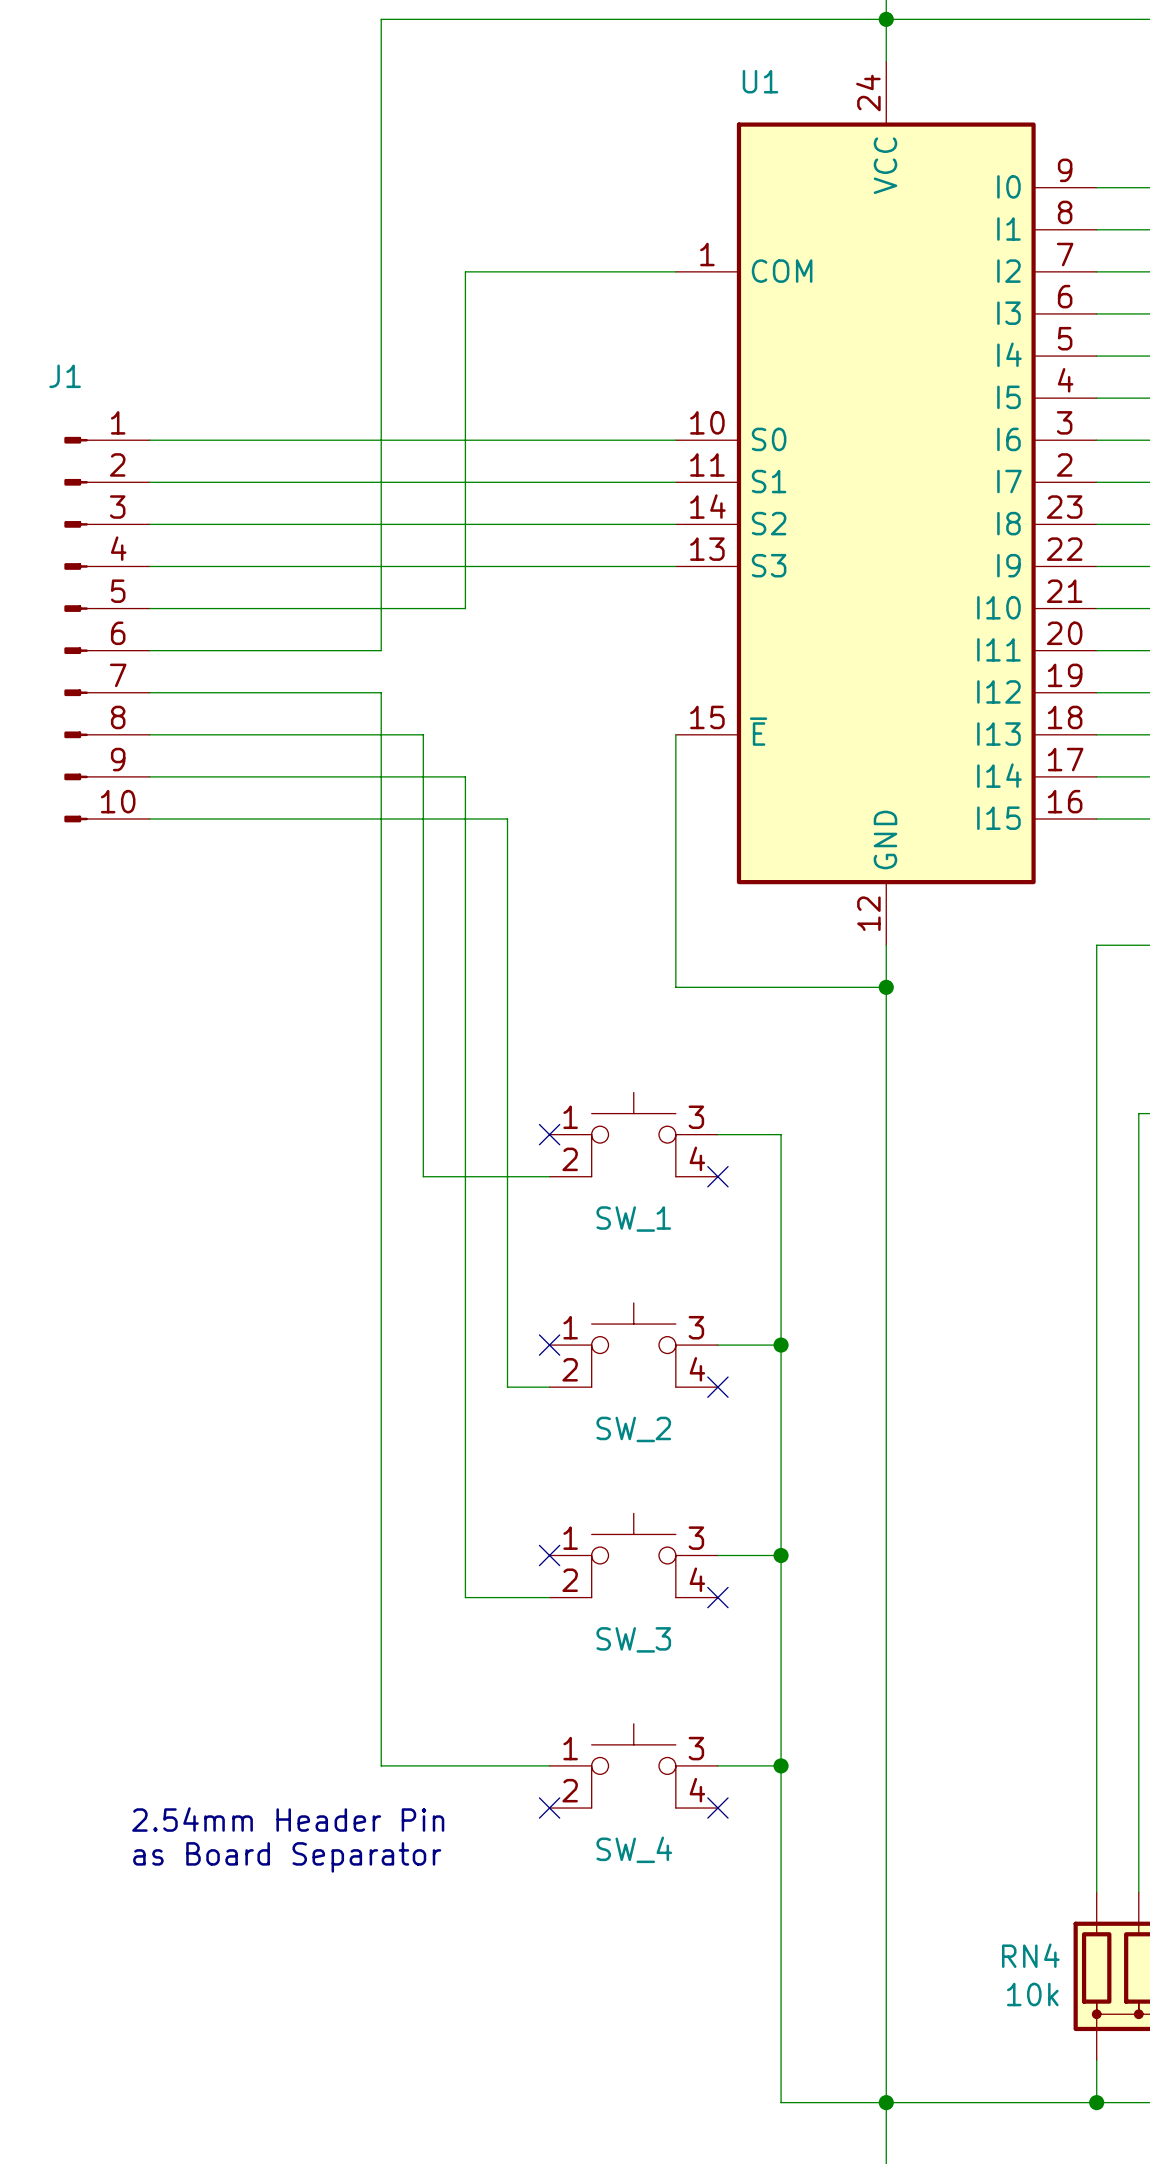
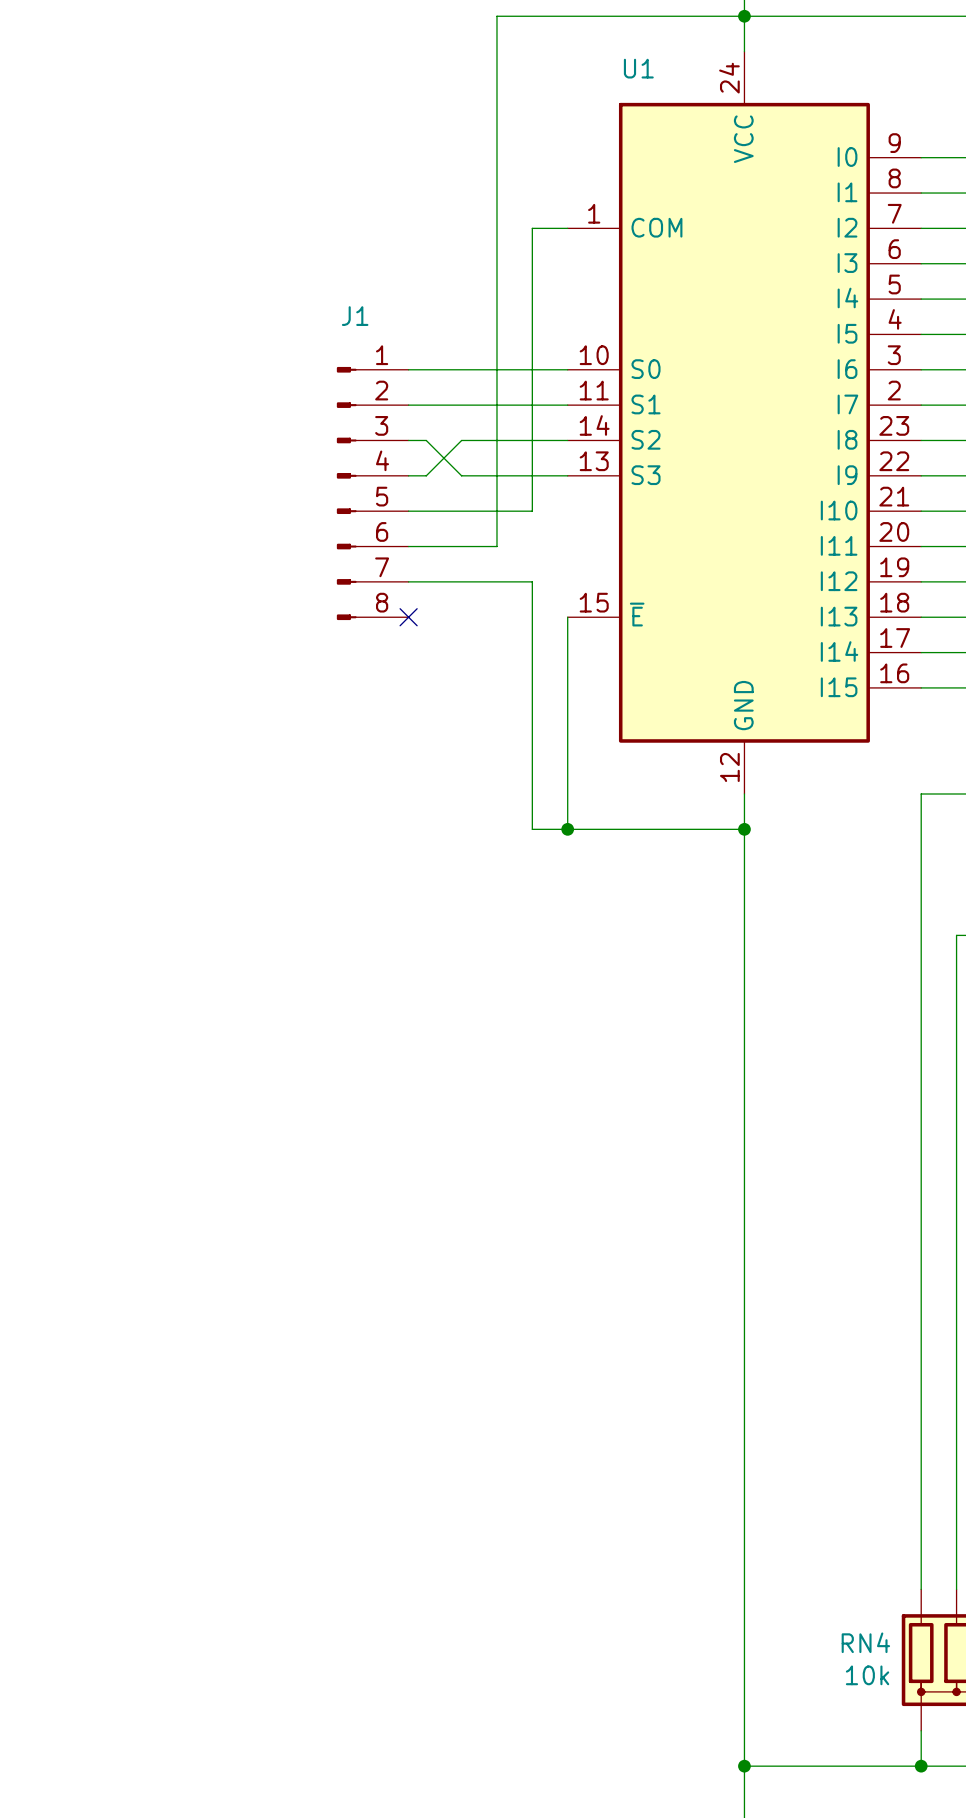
wire: (591, 19) (381, 19) (381, 650) (149, 650) -> (496, 16) (496, 546) (408, 546)
wire: (633, 271) (465, 271) (465, 608) (149, 608) -> (532, 228) (532, 511) (408, 511)
J1 name position: J1 (65, 376) -> J1 (355, 316)
J1 symbol: [64, 436, 150, 823] -> [336, 366, 409, 621]
wire: (149, 440) (486, 440) -> none
wire: (149, 482) (486, 482) -> none
wire: (149, 524) (486, 524) -> none
wire: (507, 524) (549, 524) -> (426, 440) (461, 475)
wire: (149, 566) (486, 566) -> none
wire: (507, 566) (549, 566) -> (426, 475) (461, 440)
wire: (149, 692) (381, 692) (381, 1765) (549, 1765) -> none
wire: none -> (408, 581) (532, 581) (532, 829) (567, 829)
wire: (149, 734) (423, 734) (423, 1176) (549, 1176) -> none
no-connect mark: none -> (408, 617)
wire: (149, 776) (465, 776) (465, 1597) (549, 1597) -> none
wire: (149, 818) (507, 818) (507, 1387) (549, 1387) -> none
junction: none -> (567, 829)
no-connect mark: (549, 1134) -> none
SW_1: (633, 1134) -> none
wire: (717, 1134) (781, 1134) (781, 2102) (886, 2102) -> none
no-connect mark: (717, 1176) -> none
no-connect mark: (549, 1345) -> none
SW_2: (633, 1345) -> none
wire: (717, 1345) (781, 1345) -> none
junction: (781, 1345) -> none
no-connect mark: (717, 1387) -> none
no-connect mark: (549, 1555) -> none
SW_3: (633, 1555) -> none
wire: (717, 1555) (781, 1555) -> none
junction: (781, 1555) -> none
no-connect mark: (717, 1597) -> none
SW_4: (633, 1765) -> none
wire: (717, 1765) (781, 1765) -> none
junction: (781, 1765) -> none
no-connect mark: (549, 1808) -> none
no-connect mark: (717, 1808) -> none
text: 2.54mm Header Pin (288, 1819) -> none
text: as Board Separator (287, 1857) -> none

